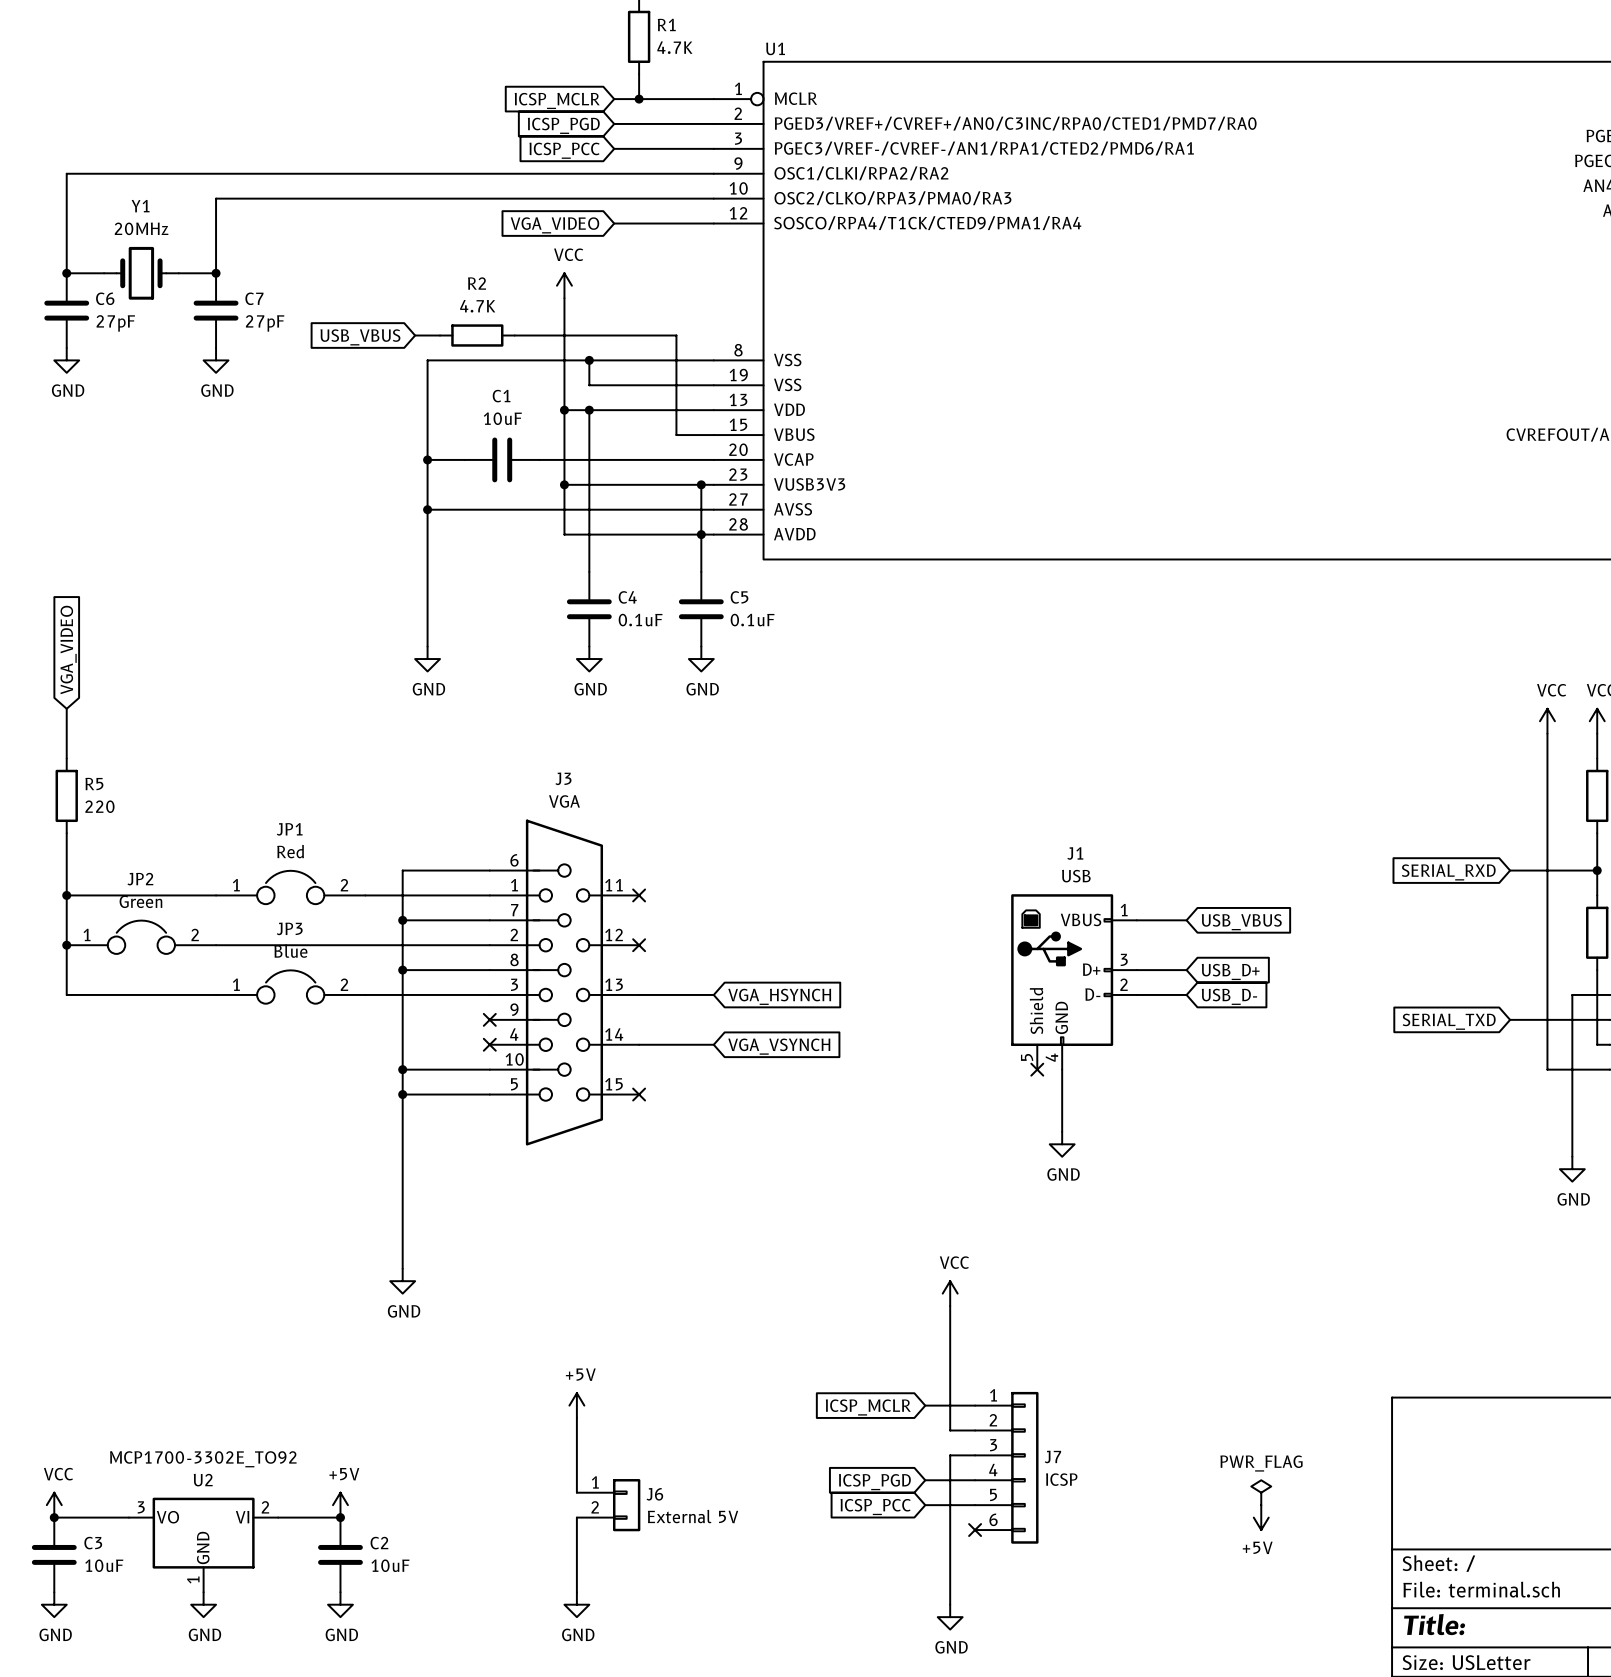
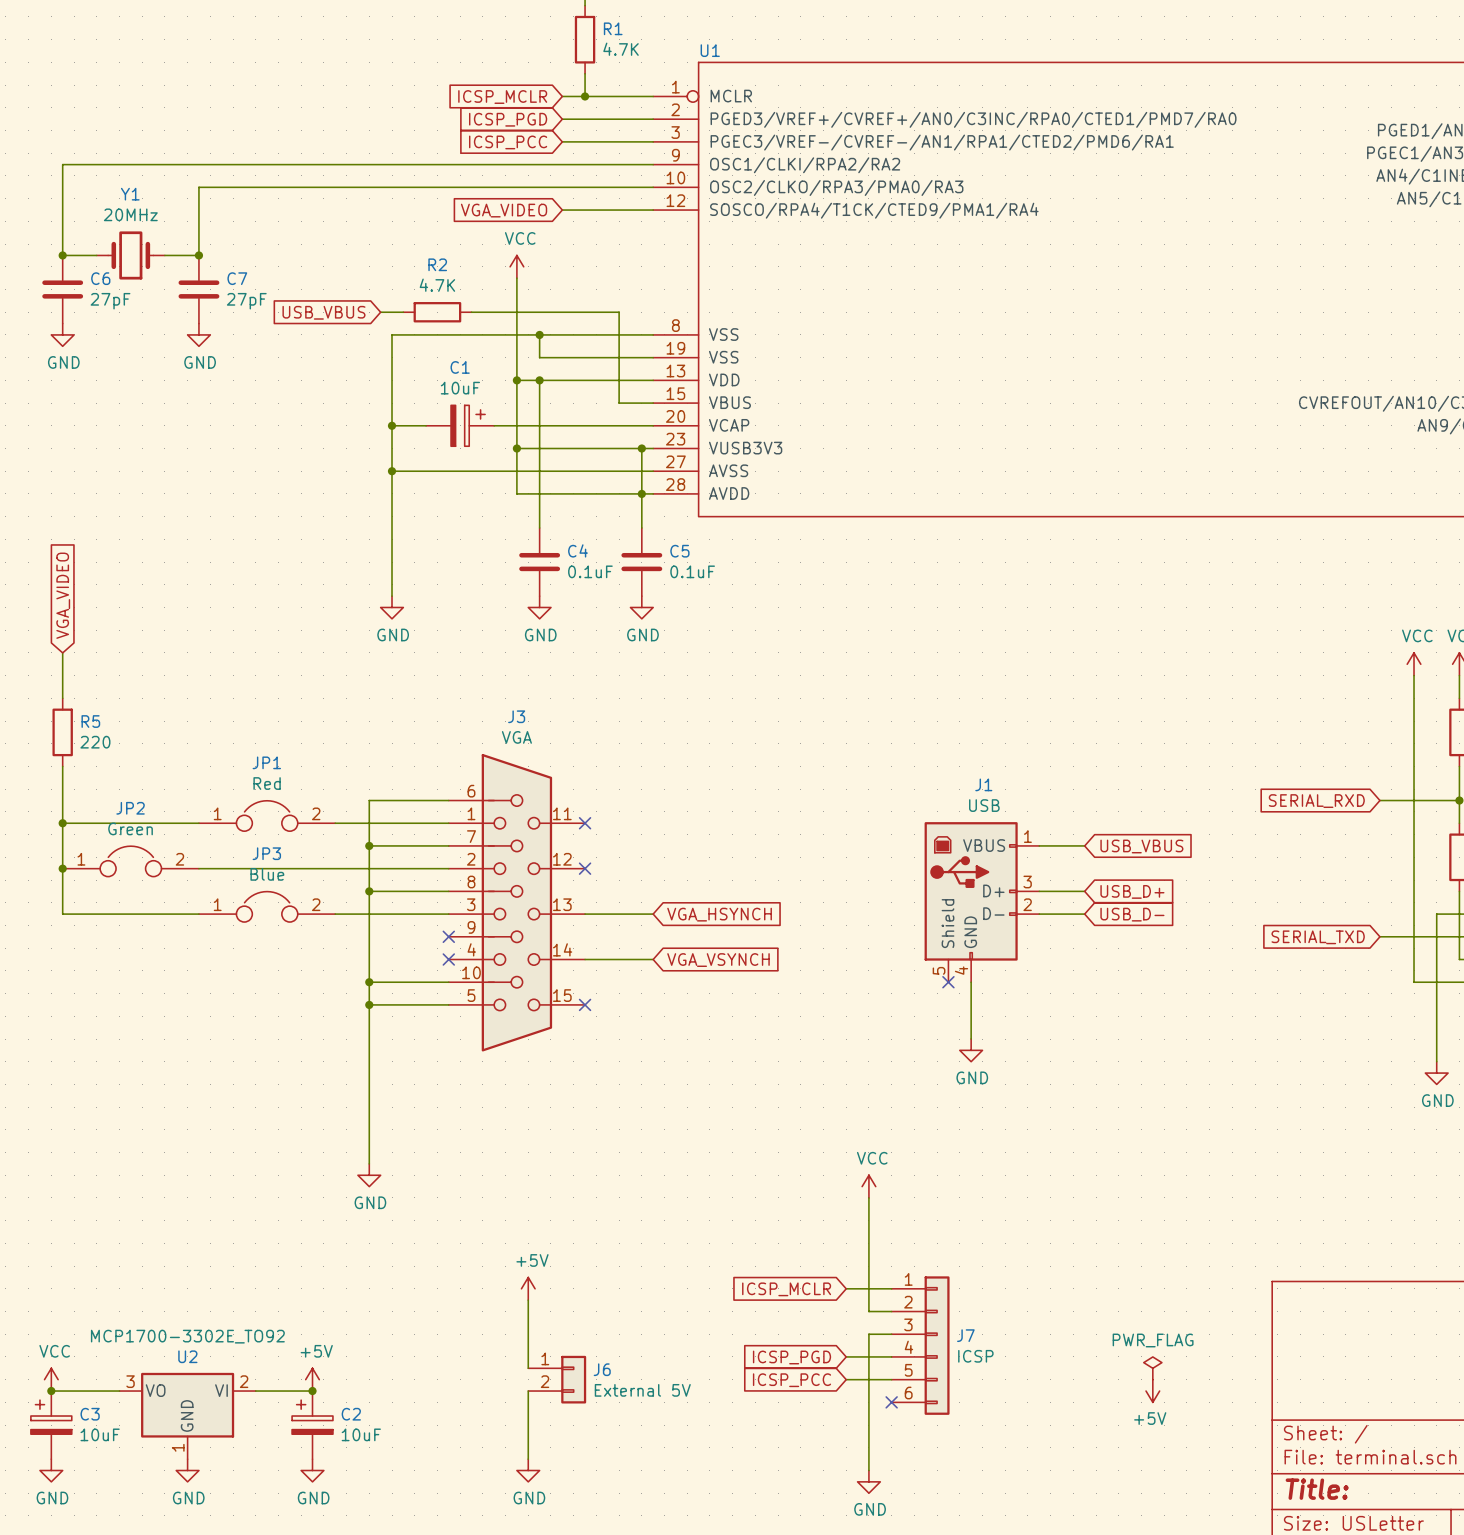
C1 symbol: [464, 437, 540, 483] -> [426, 405, 495, 447]
C3 symbol: [31, 1517, 77, 1593] -> [30, 1391, 72, 1460]
C2 symbol: [318, 1517, 363, 1593] -> [292, 1391, 333, 1460]

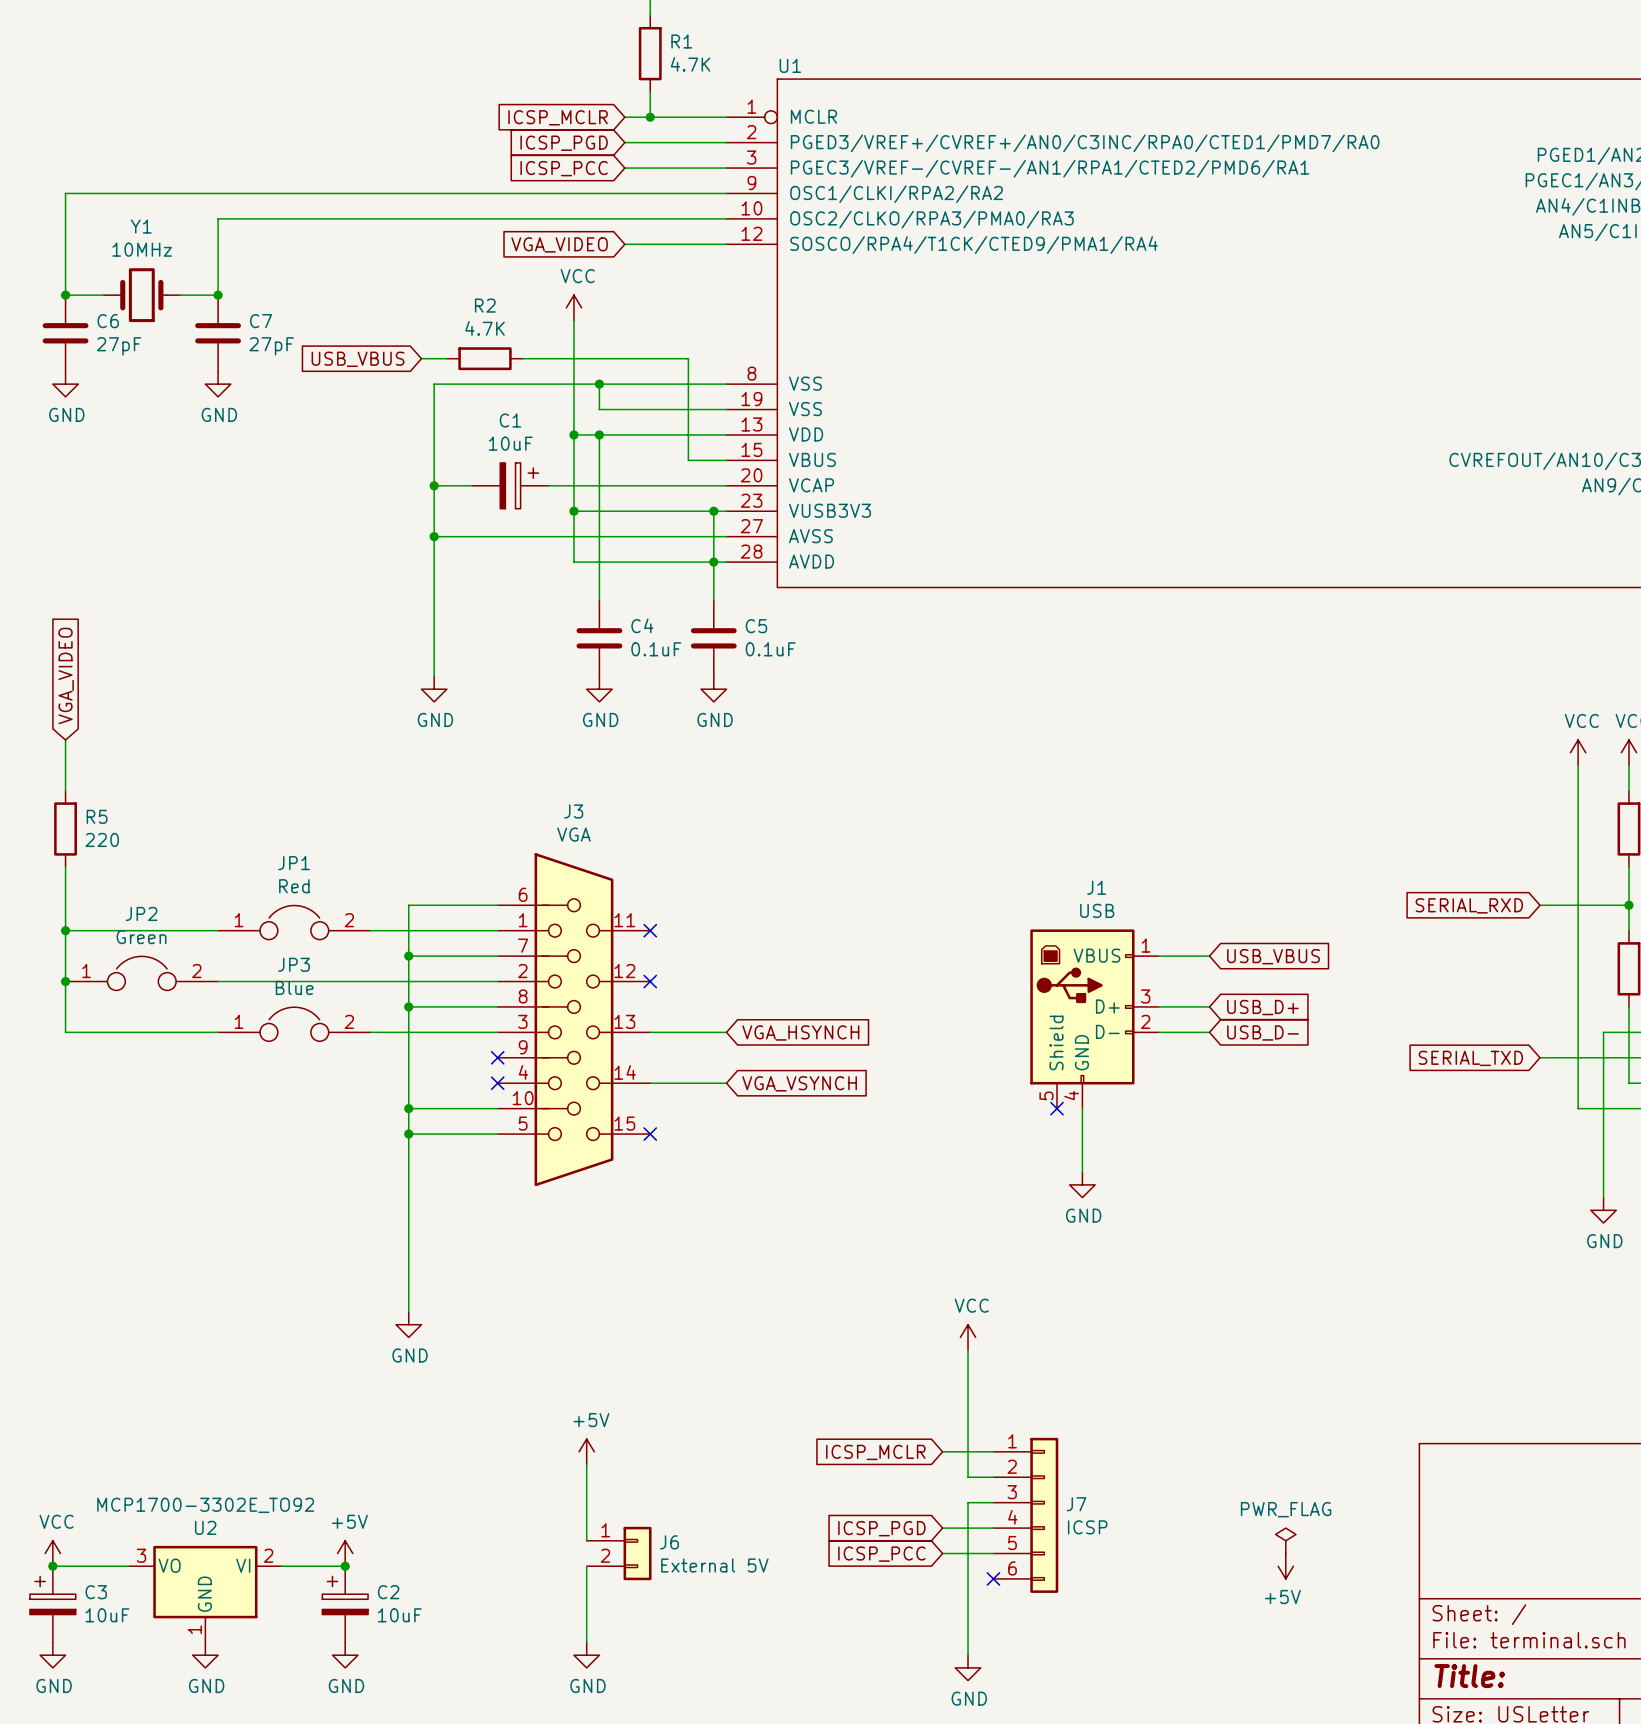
Y1 value: 20MHz (130, 214) -> 10MHz (142, 249)

